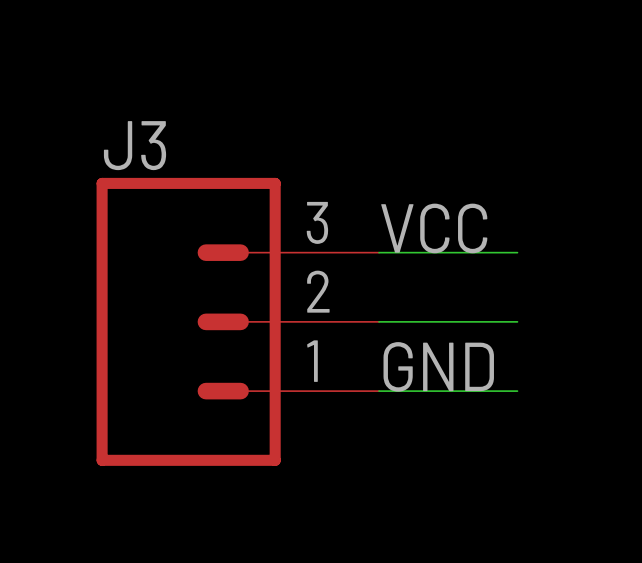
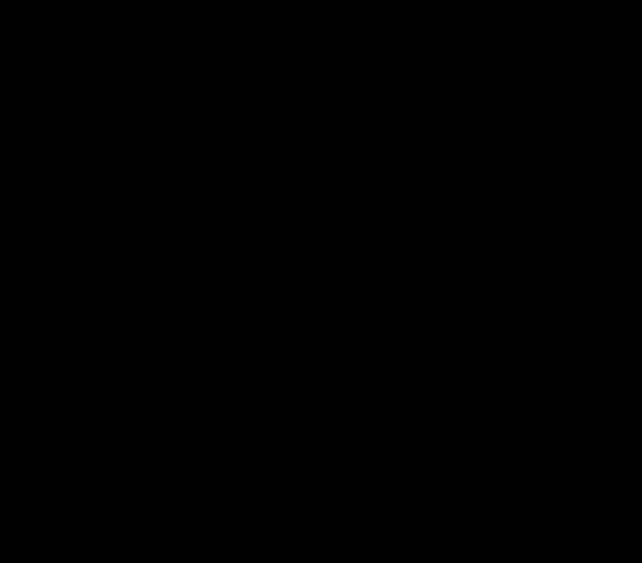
label: VCC (434, 228) -> none
wire: (379, 252) (517, 252) -> none
J3: (237, 321) -> none
wire: (379, 321) (517, 321) -> none
label: GND (438, 366) -> none
wire: (379, 391) (517, 391) -> none

